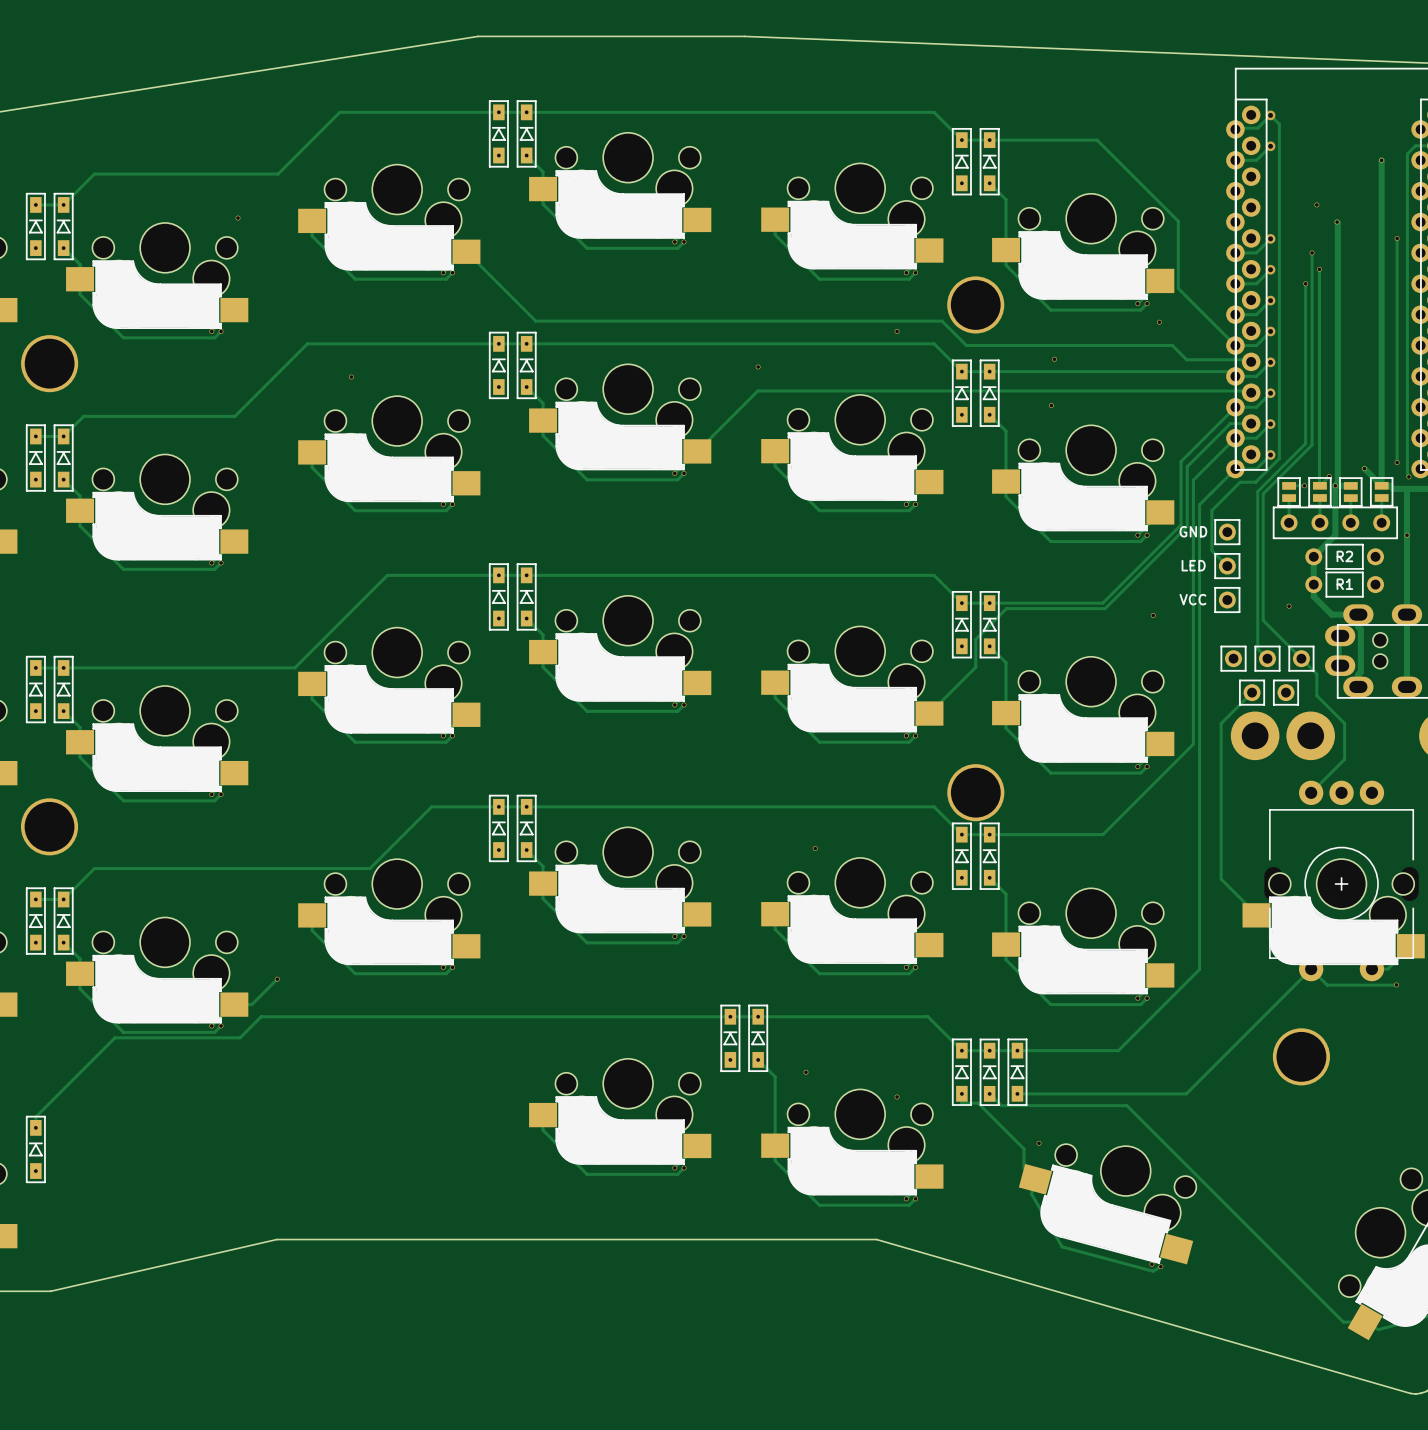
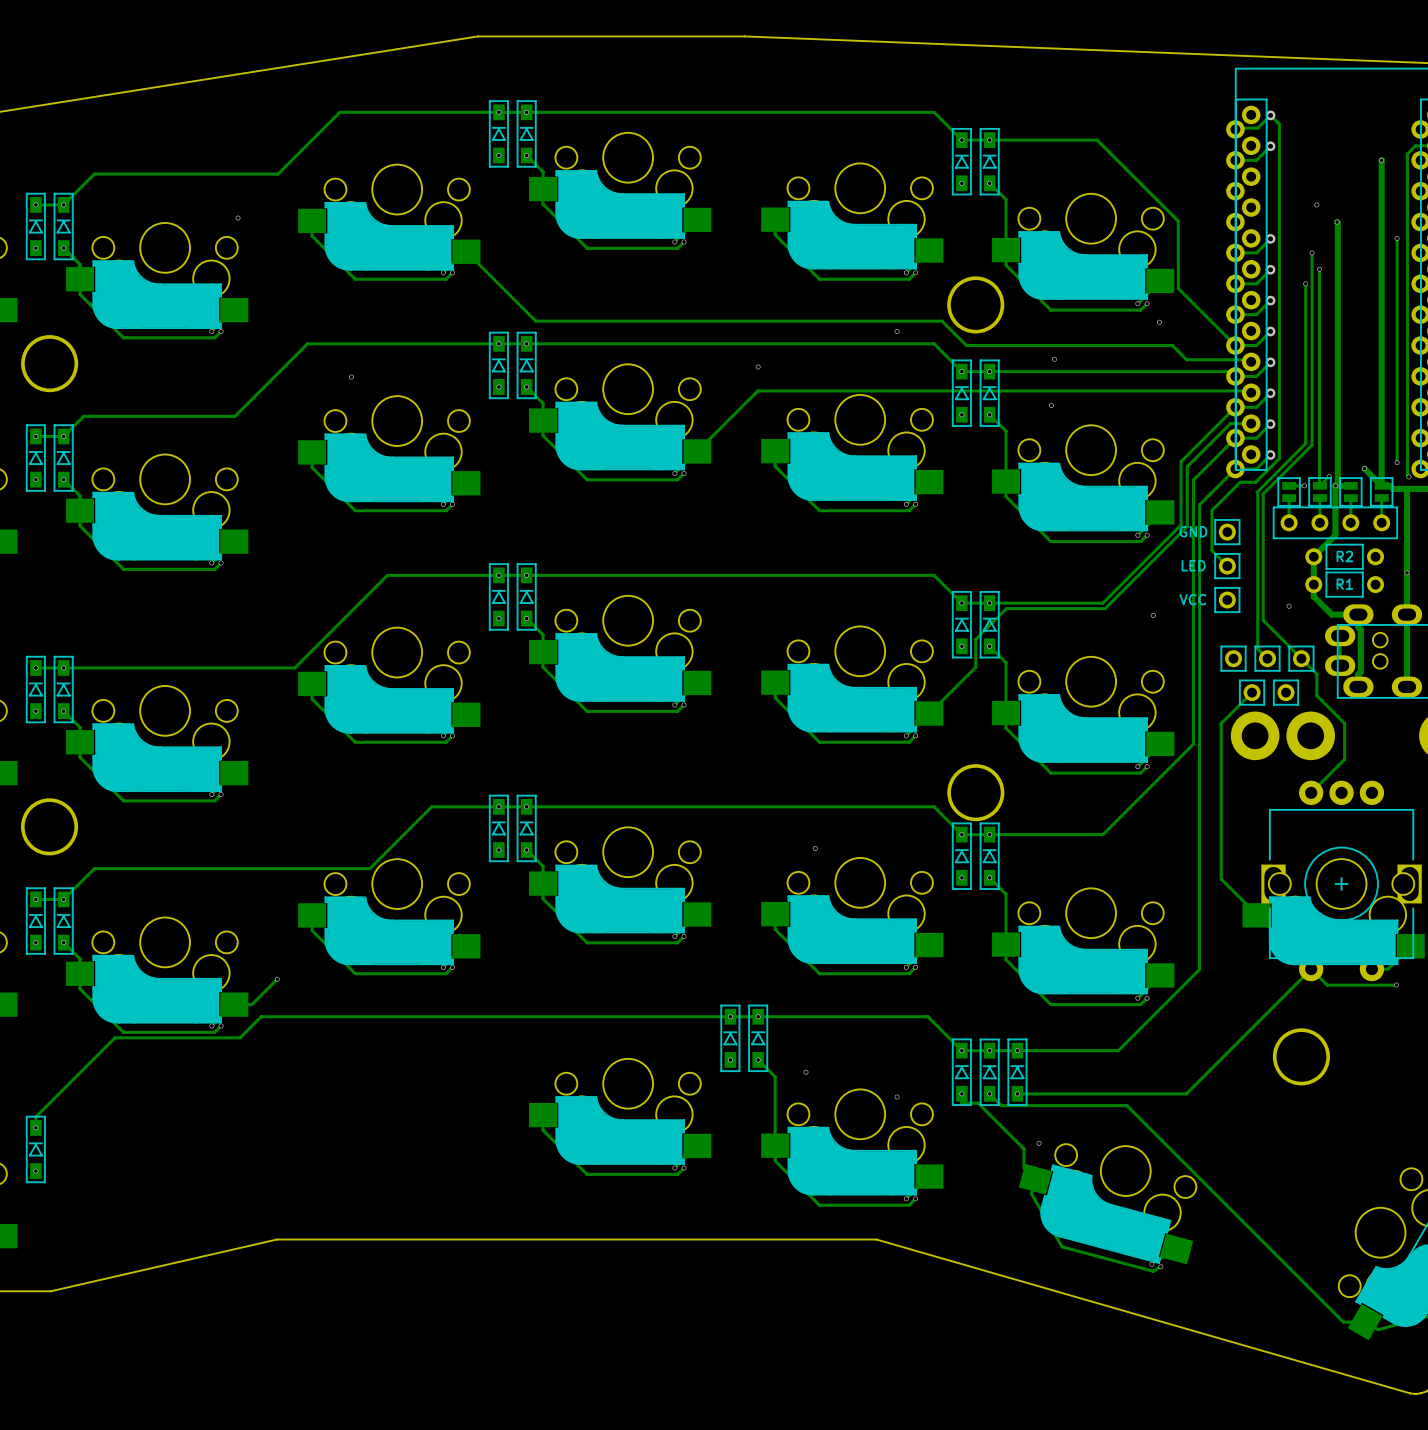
via: (1406, 535) -> none
via: none -> (1406, 572)
part footprint: [1264, 780, 1419, 982] -> [1261, 780, 1422, 982]

